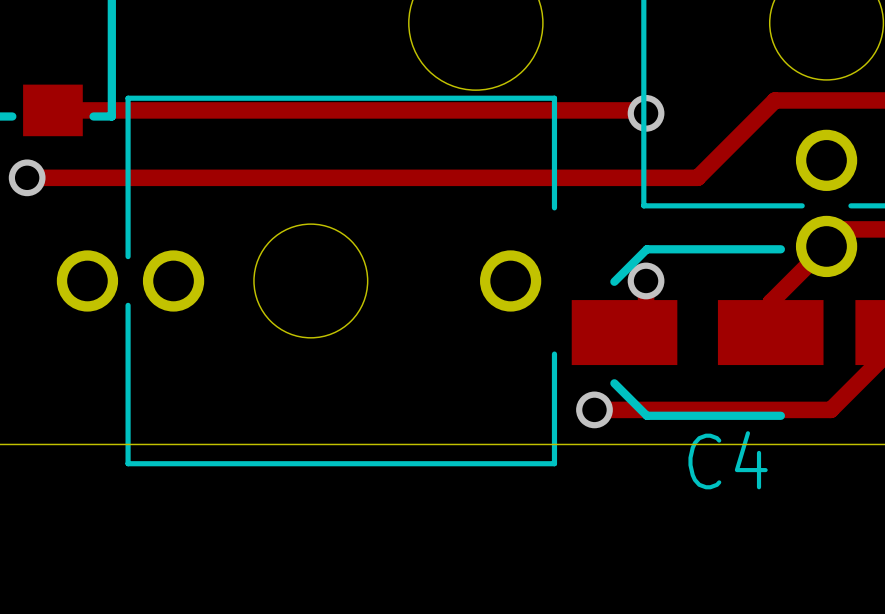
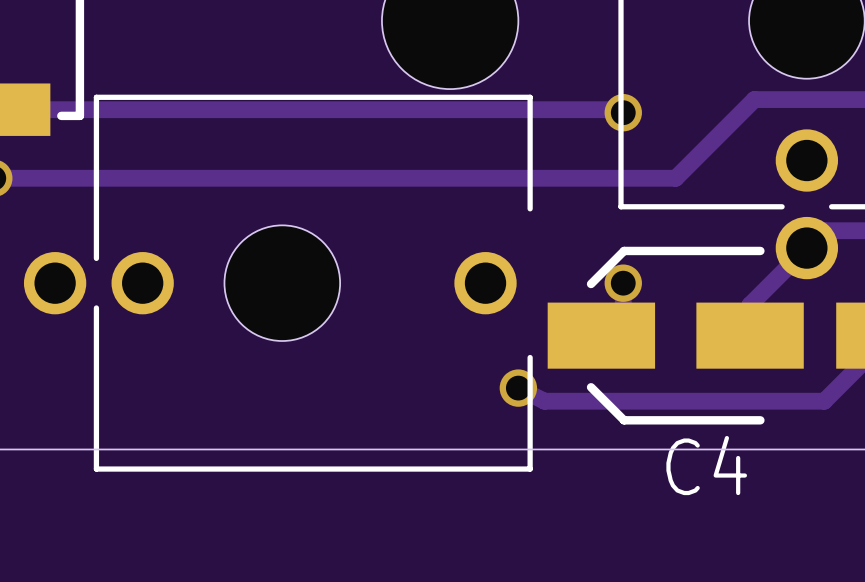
track: (843, 397) (830, 409) (594, 409) -> (824, 401) (544, 401) (518, 388)
via position: (594, 409) -> (518, 388)

